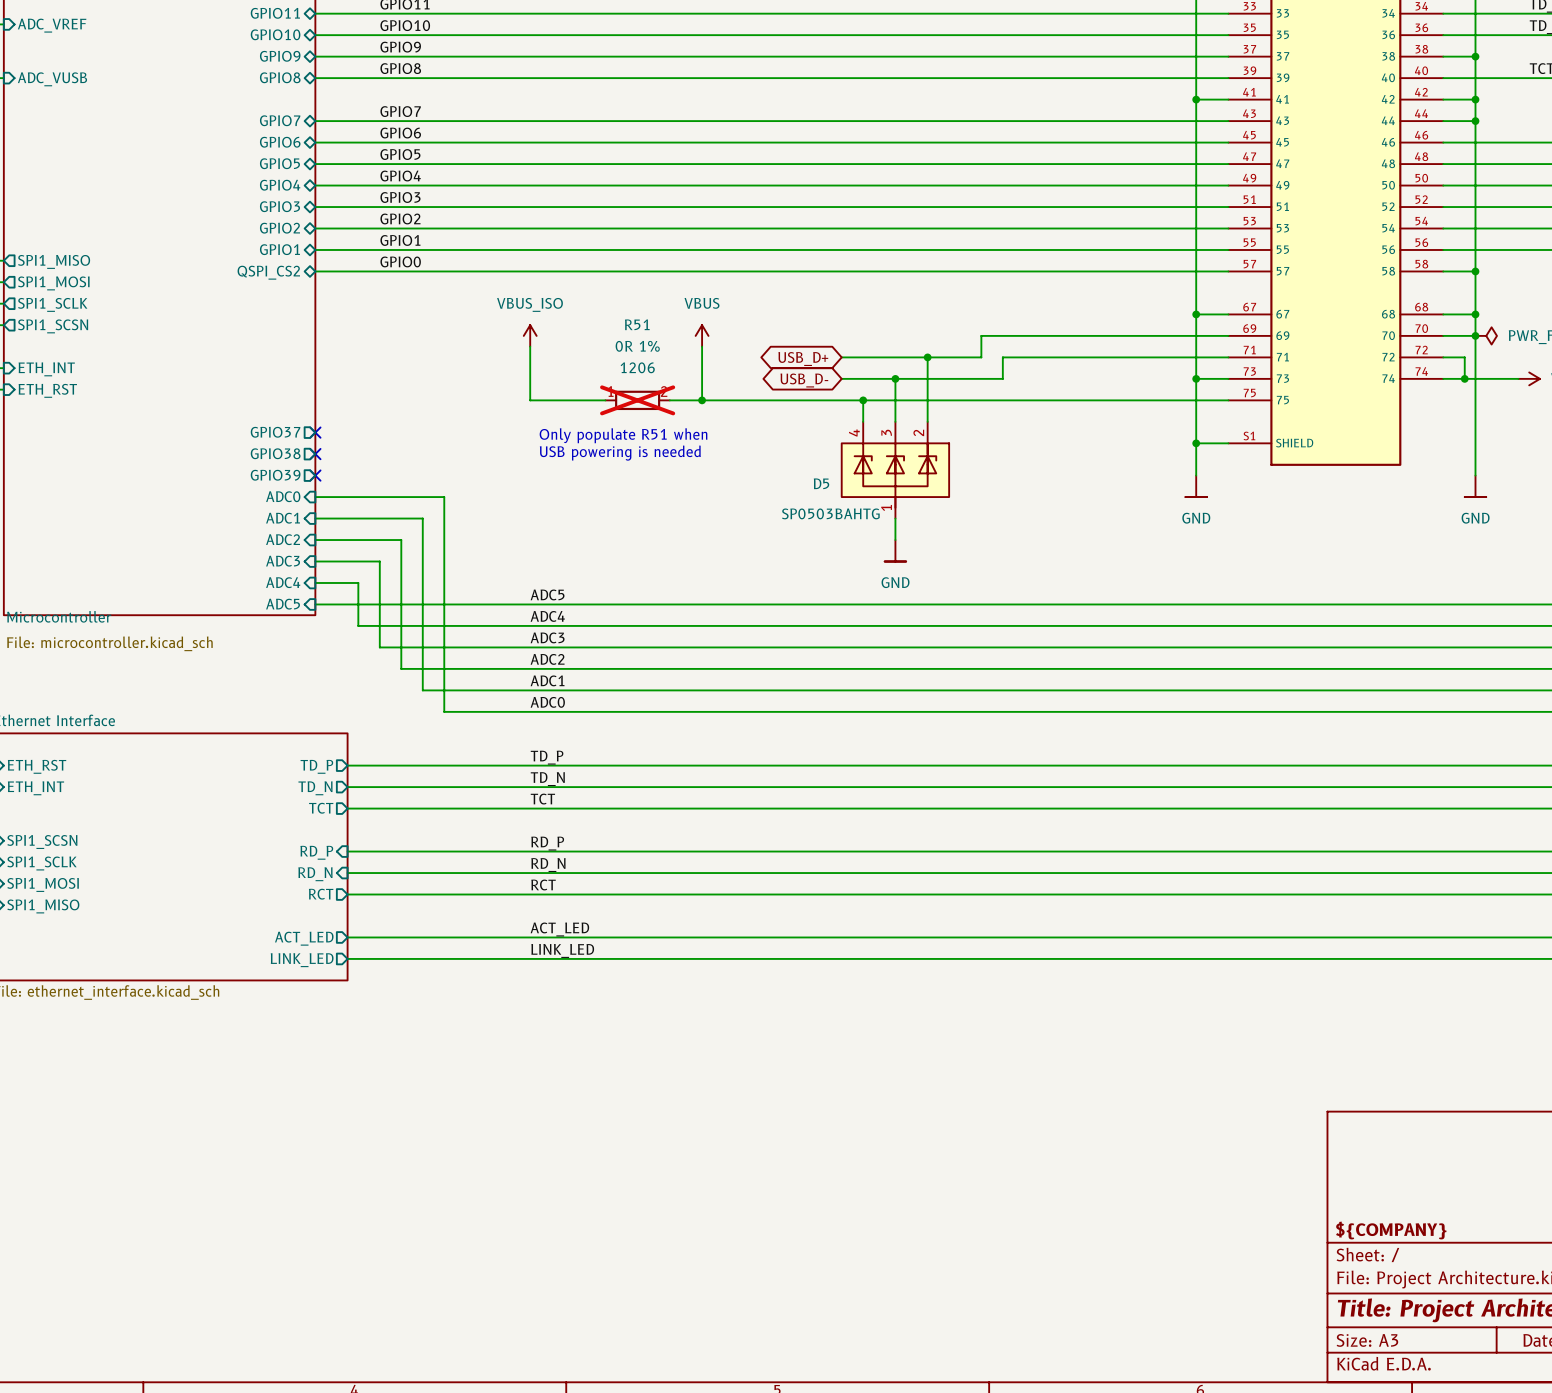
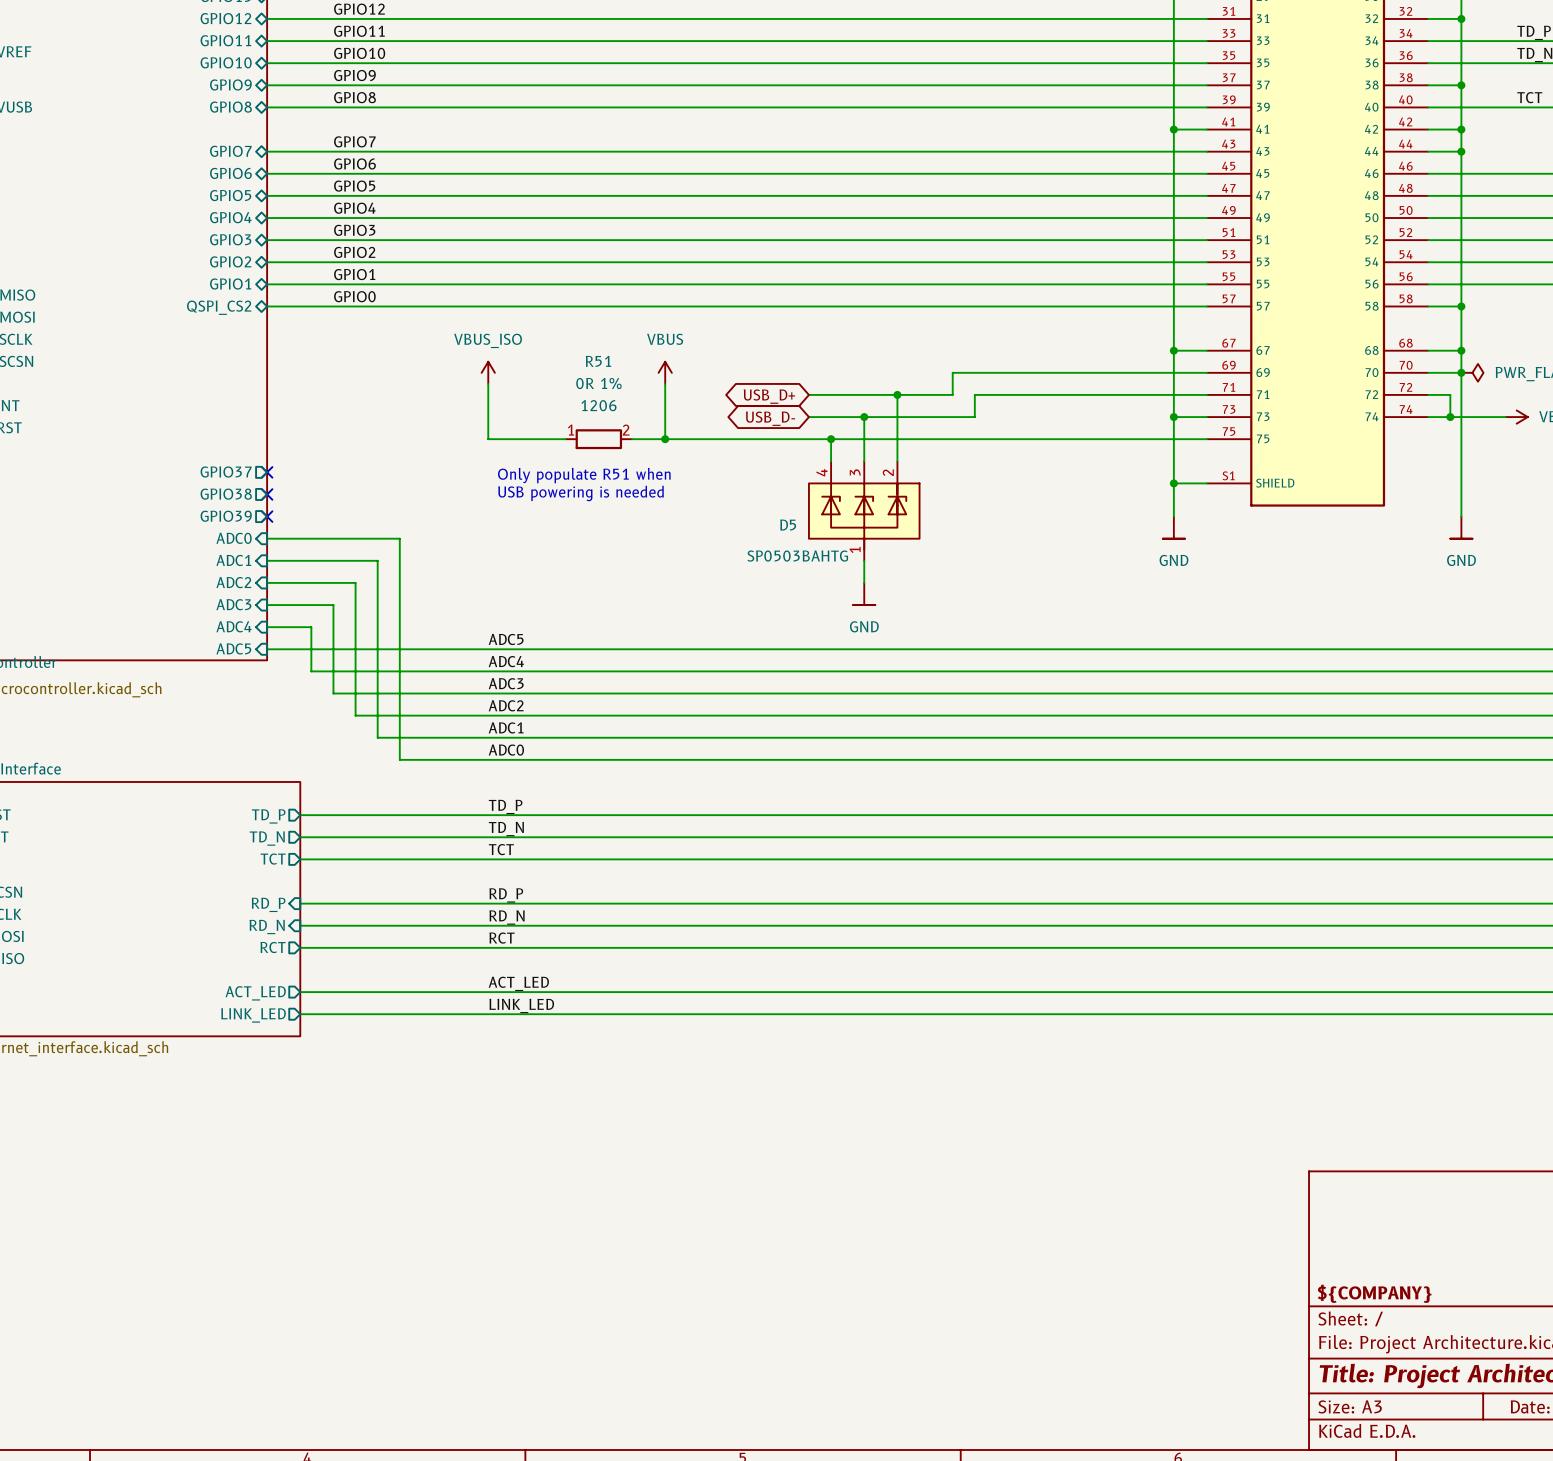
R51 do-not-place cross: (637, 400) -> none

